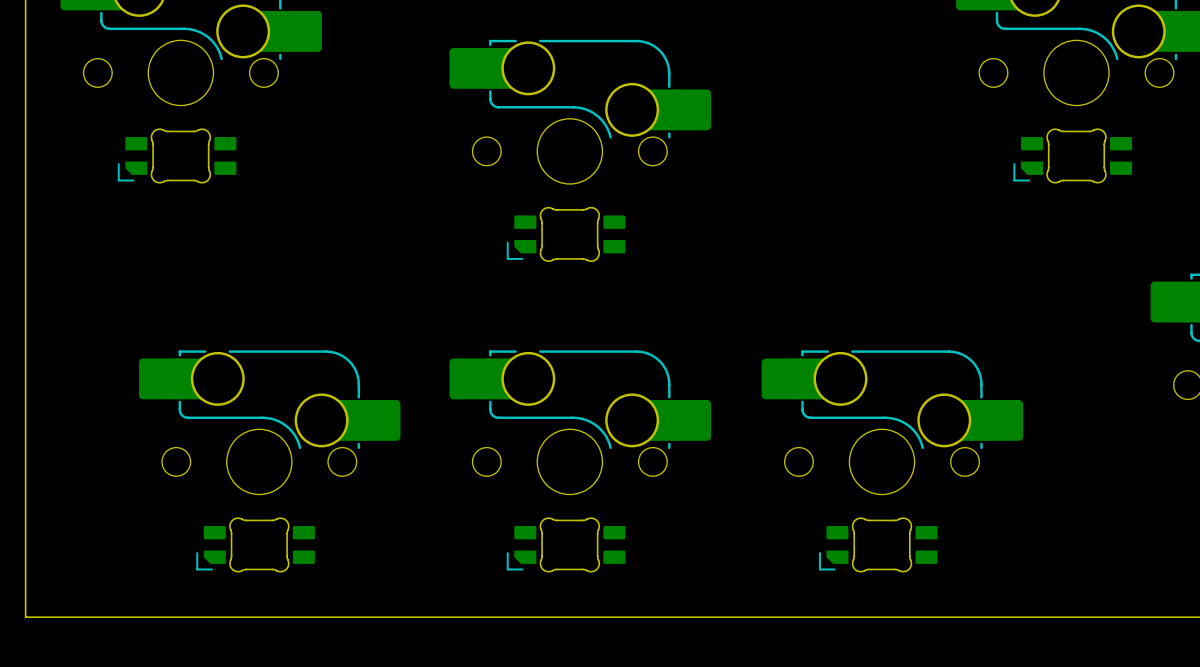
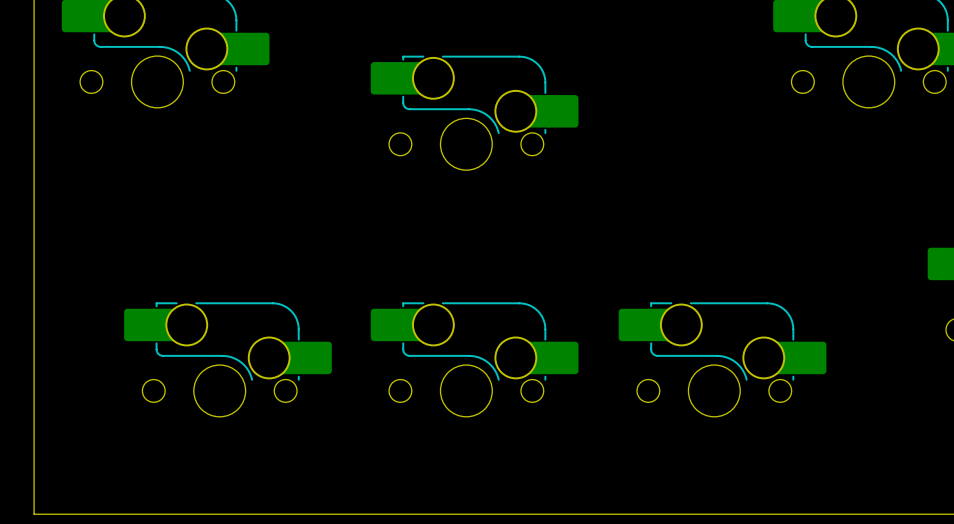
part: (177, 155) -> none
part: (1072, 155) -> none
part: (566, 234) -> none
part: (255, 544) -> none
part: (566, 544) -> none
part: (878, 544) -> none

